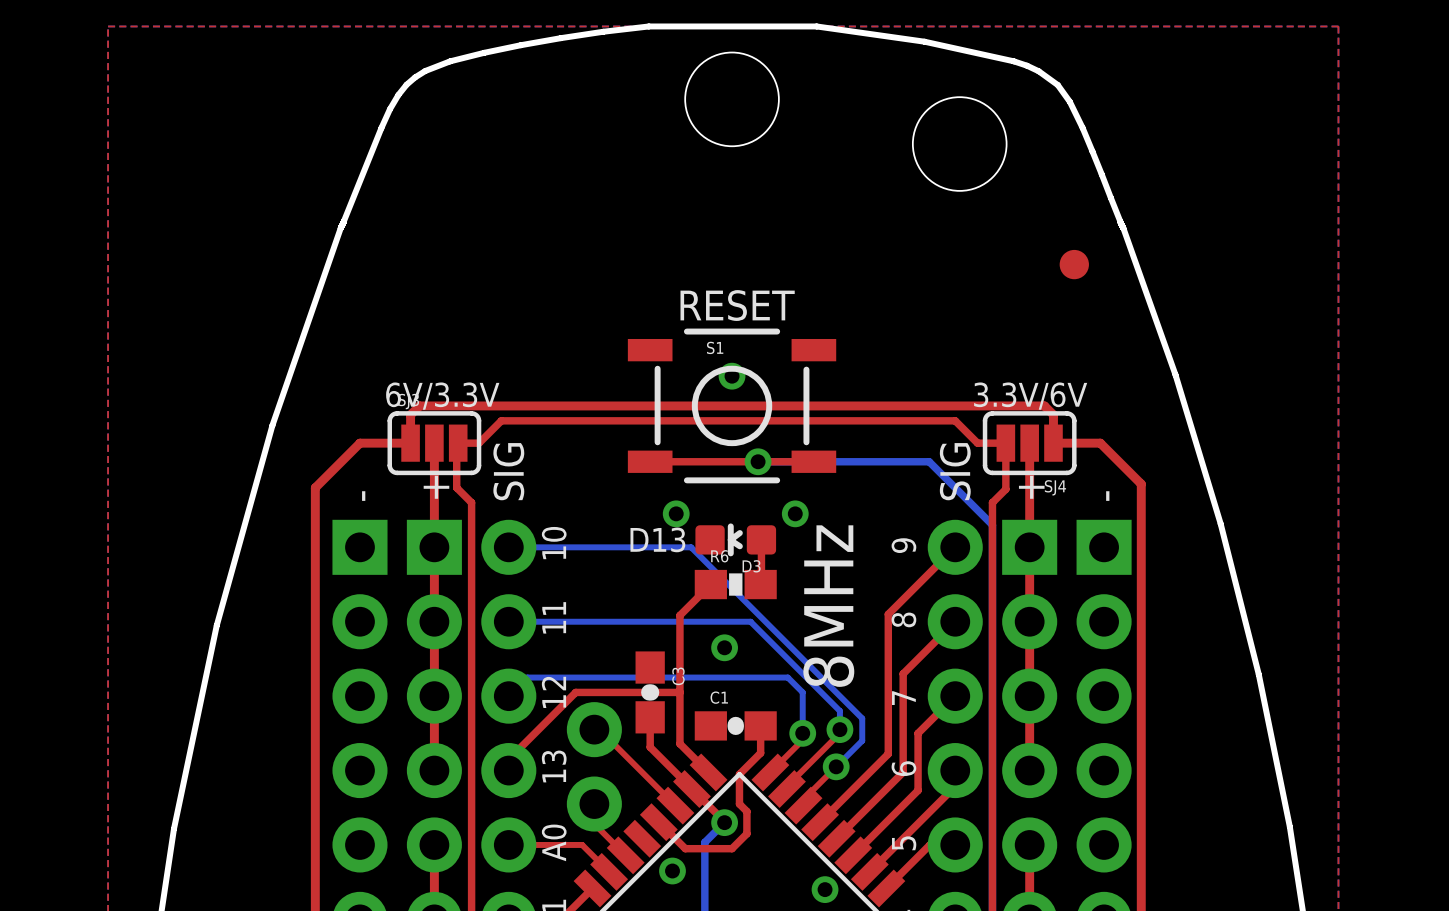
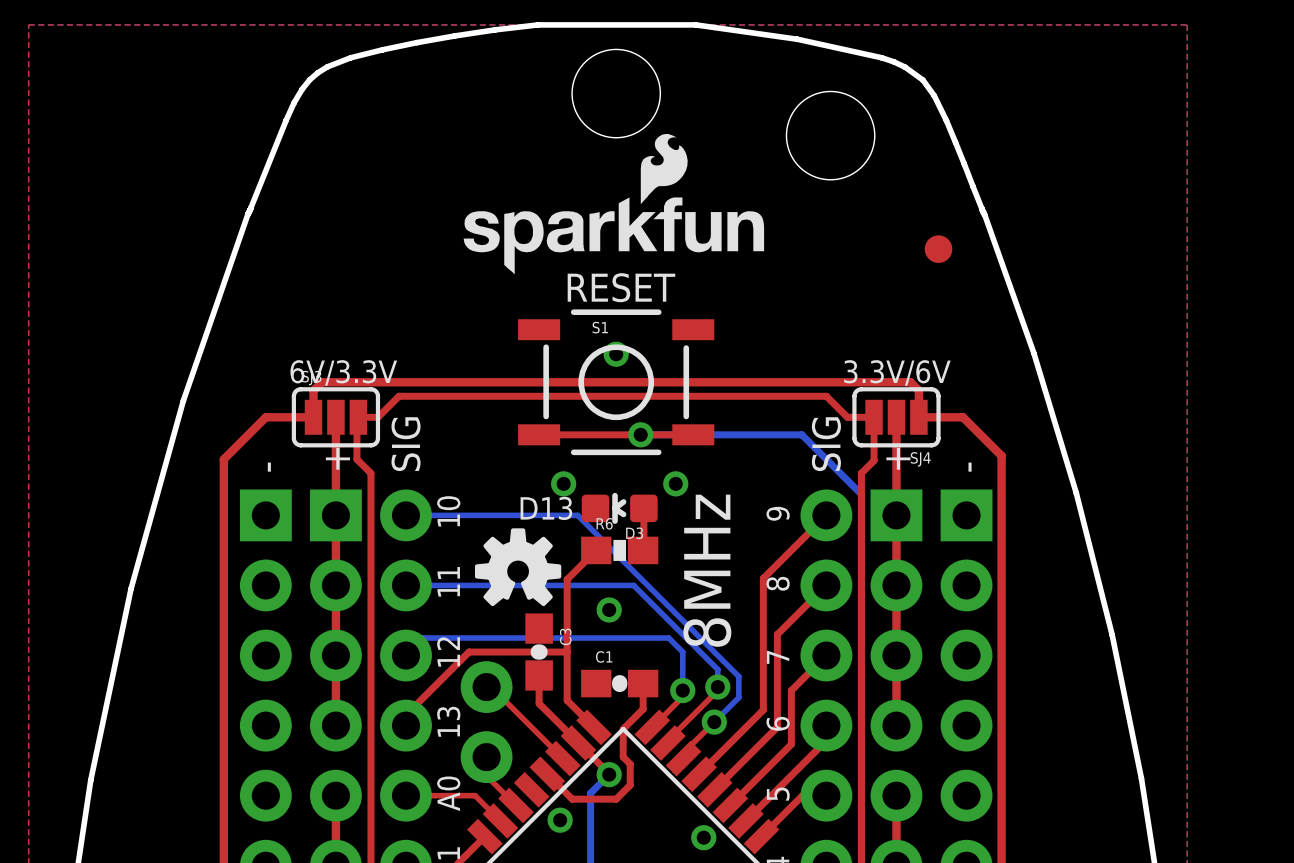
drawing: none -> [463, 133, 765, 275]
drawing: none -> [474, 528, 562, 607]

